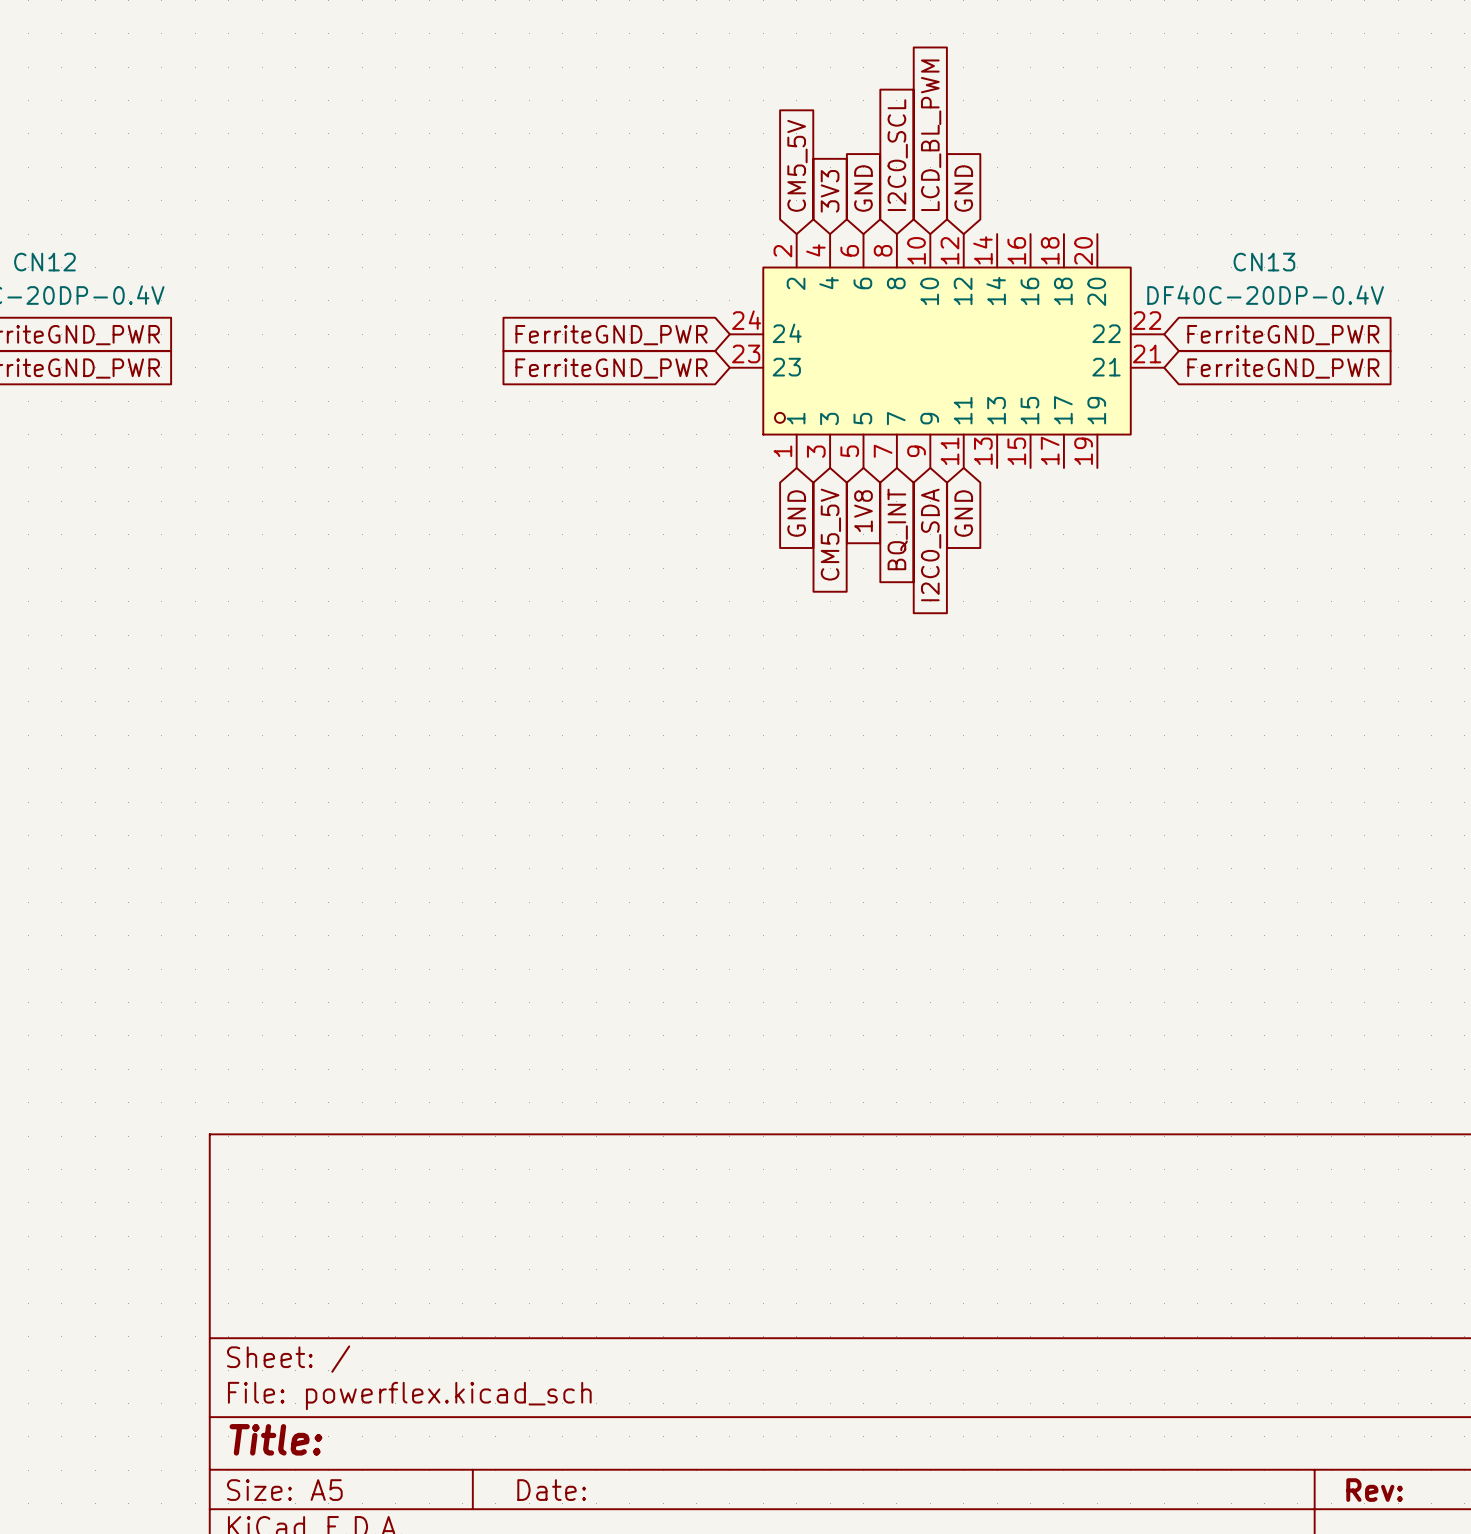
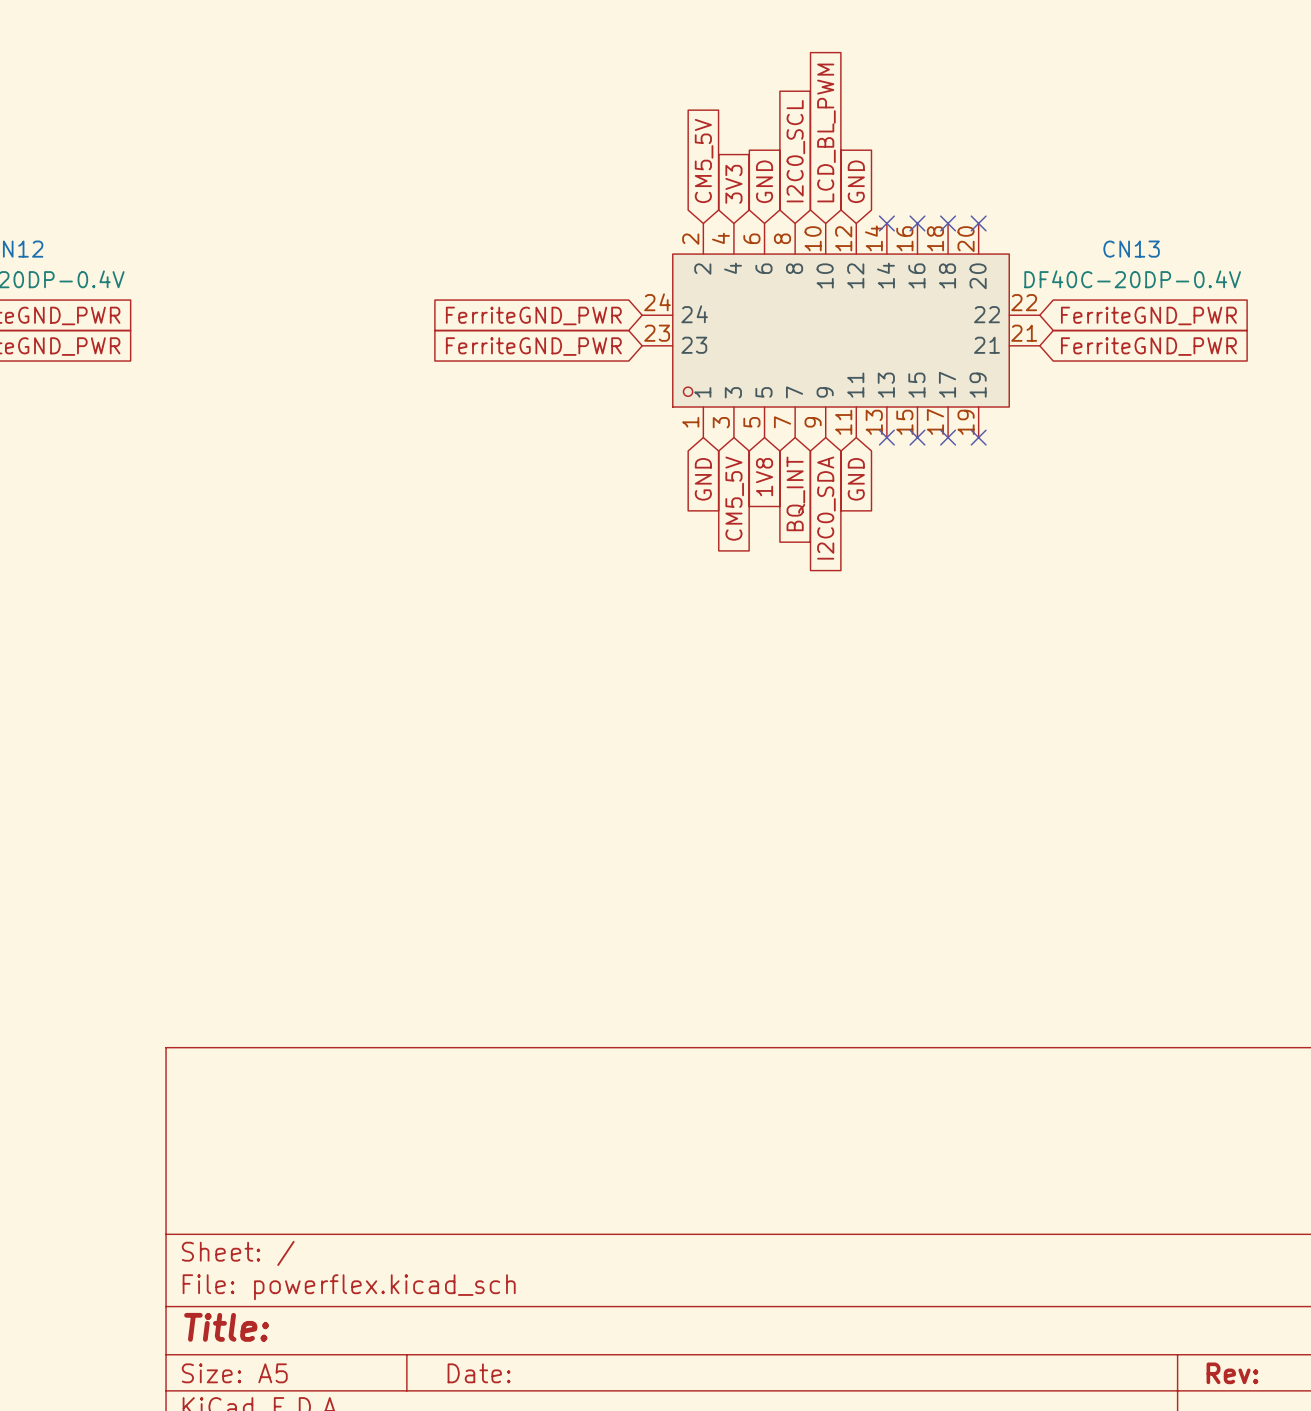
no-connect mark: none -> (886, 223)
no-connect mark: none -> (917, 223)
no-connect mark: none -> (948, 223)
no-connect mark: none -> (978, 223)
no-connect mark: none -> (886, 437)
no-connect mark: none -> (917, 437)
no-connect mark: none -> (948, 437)
no-connect mark: none -> (978, 437)

